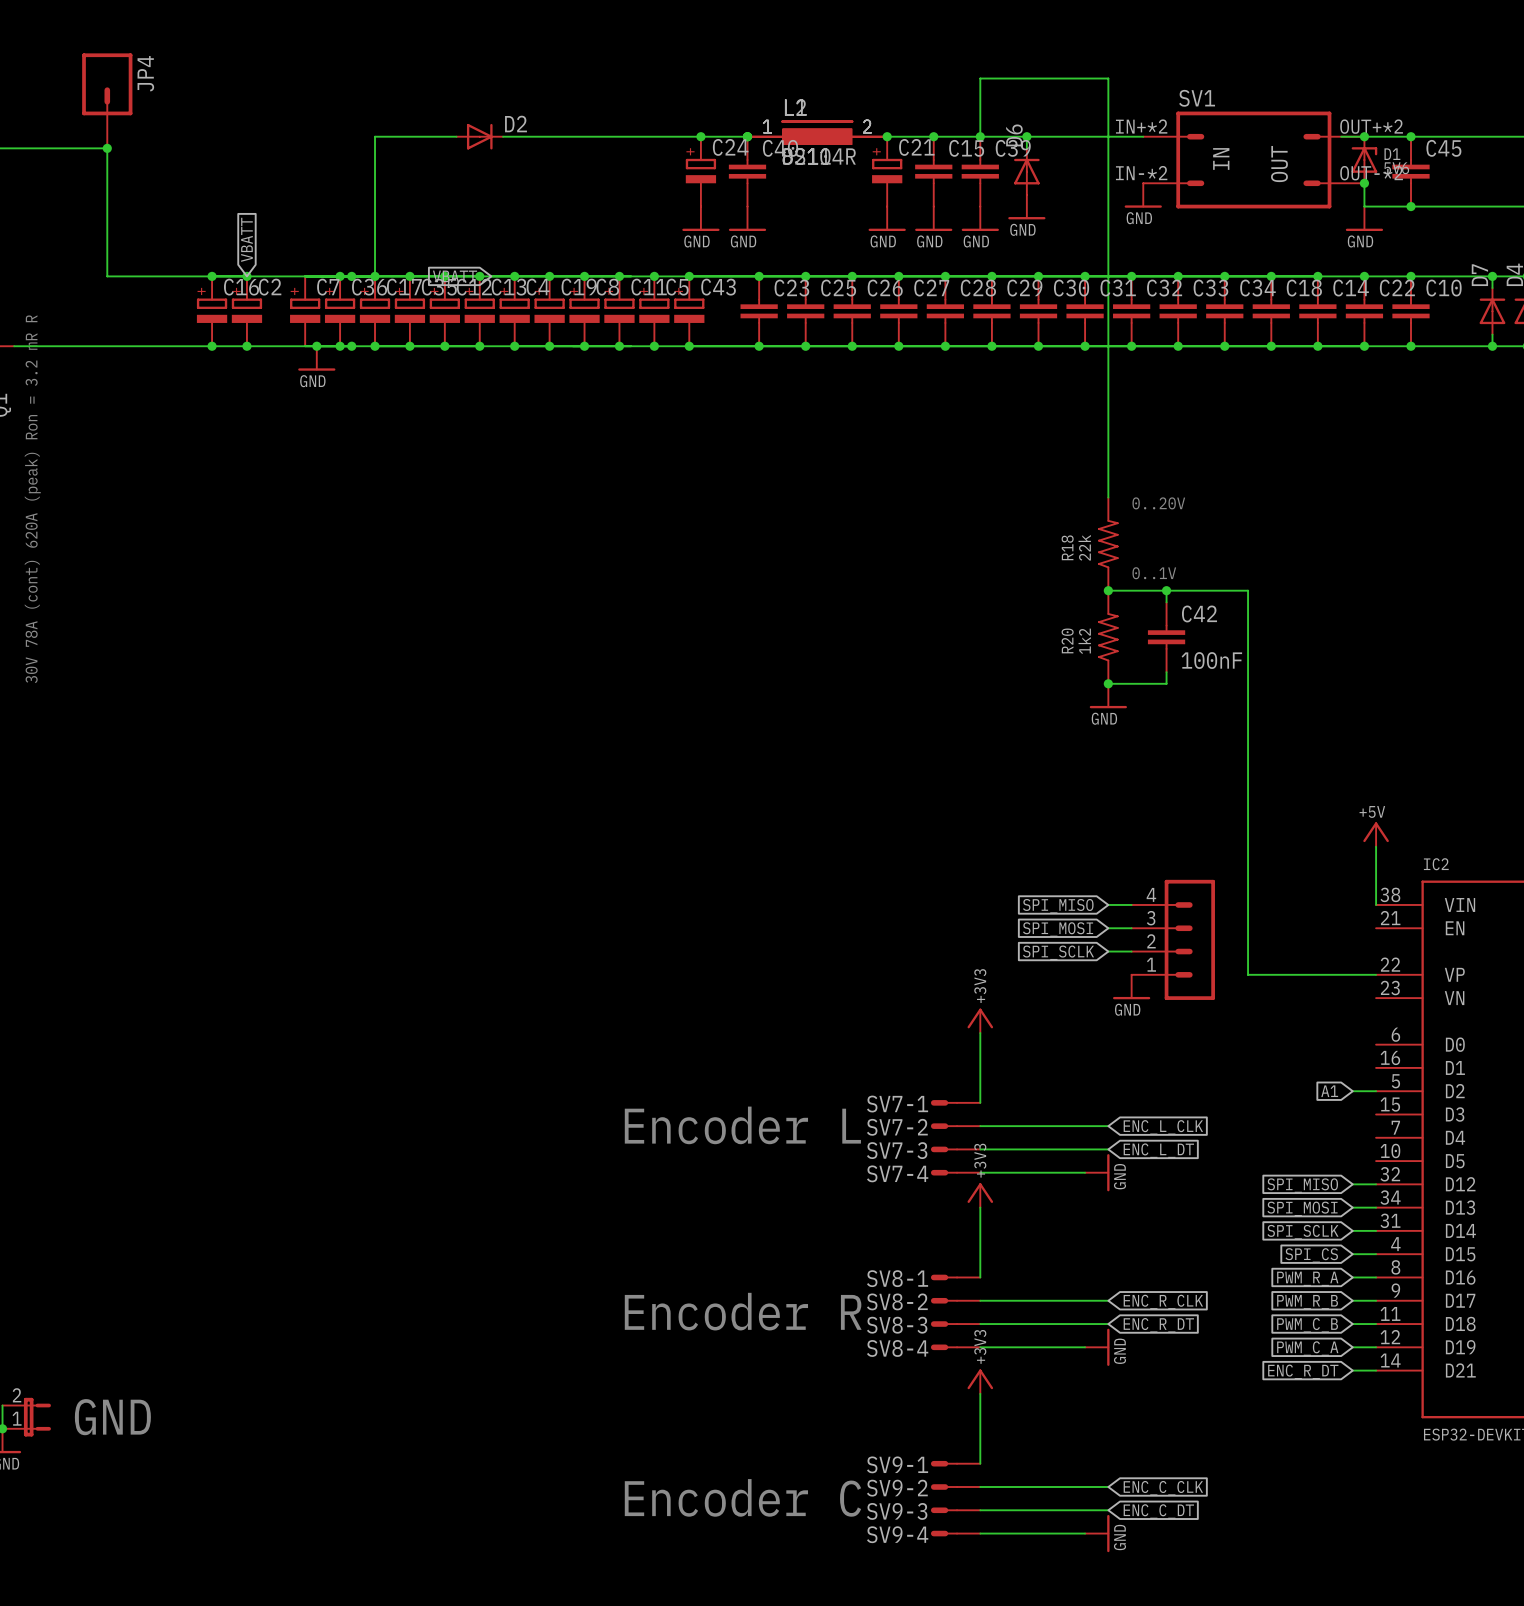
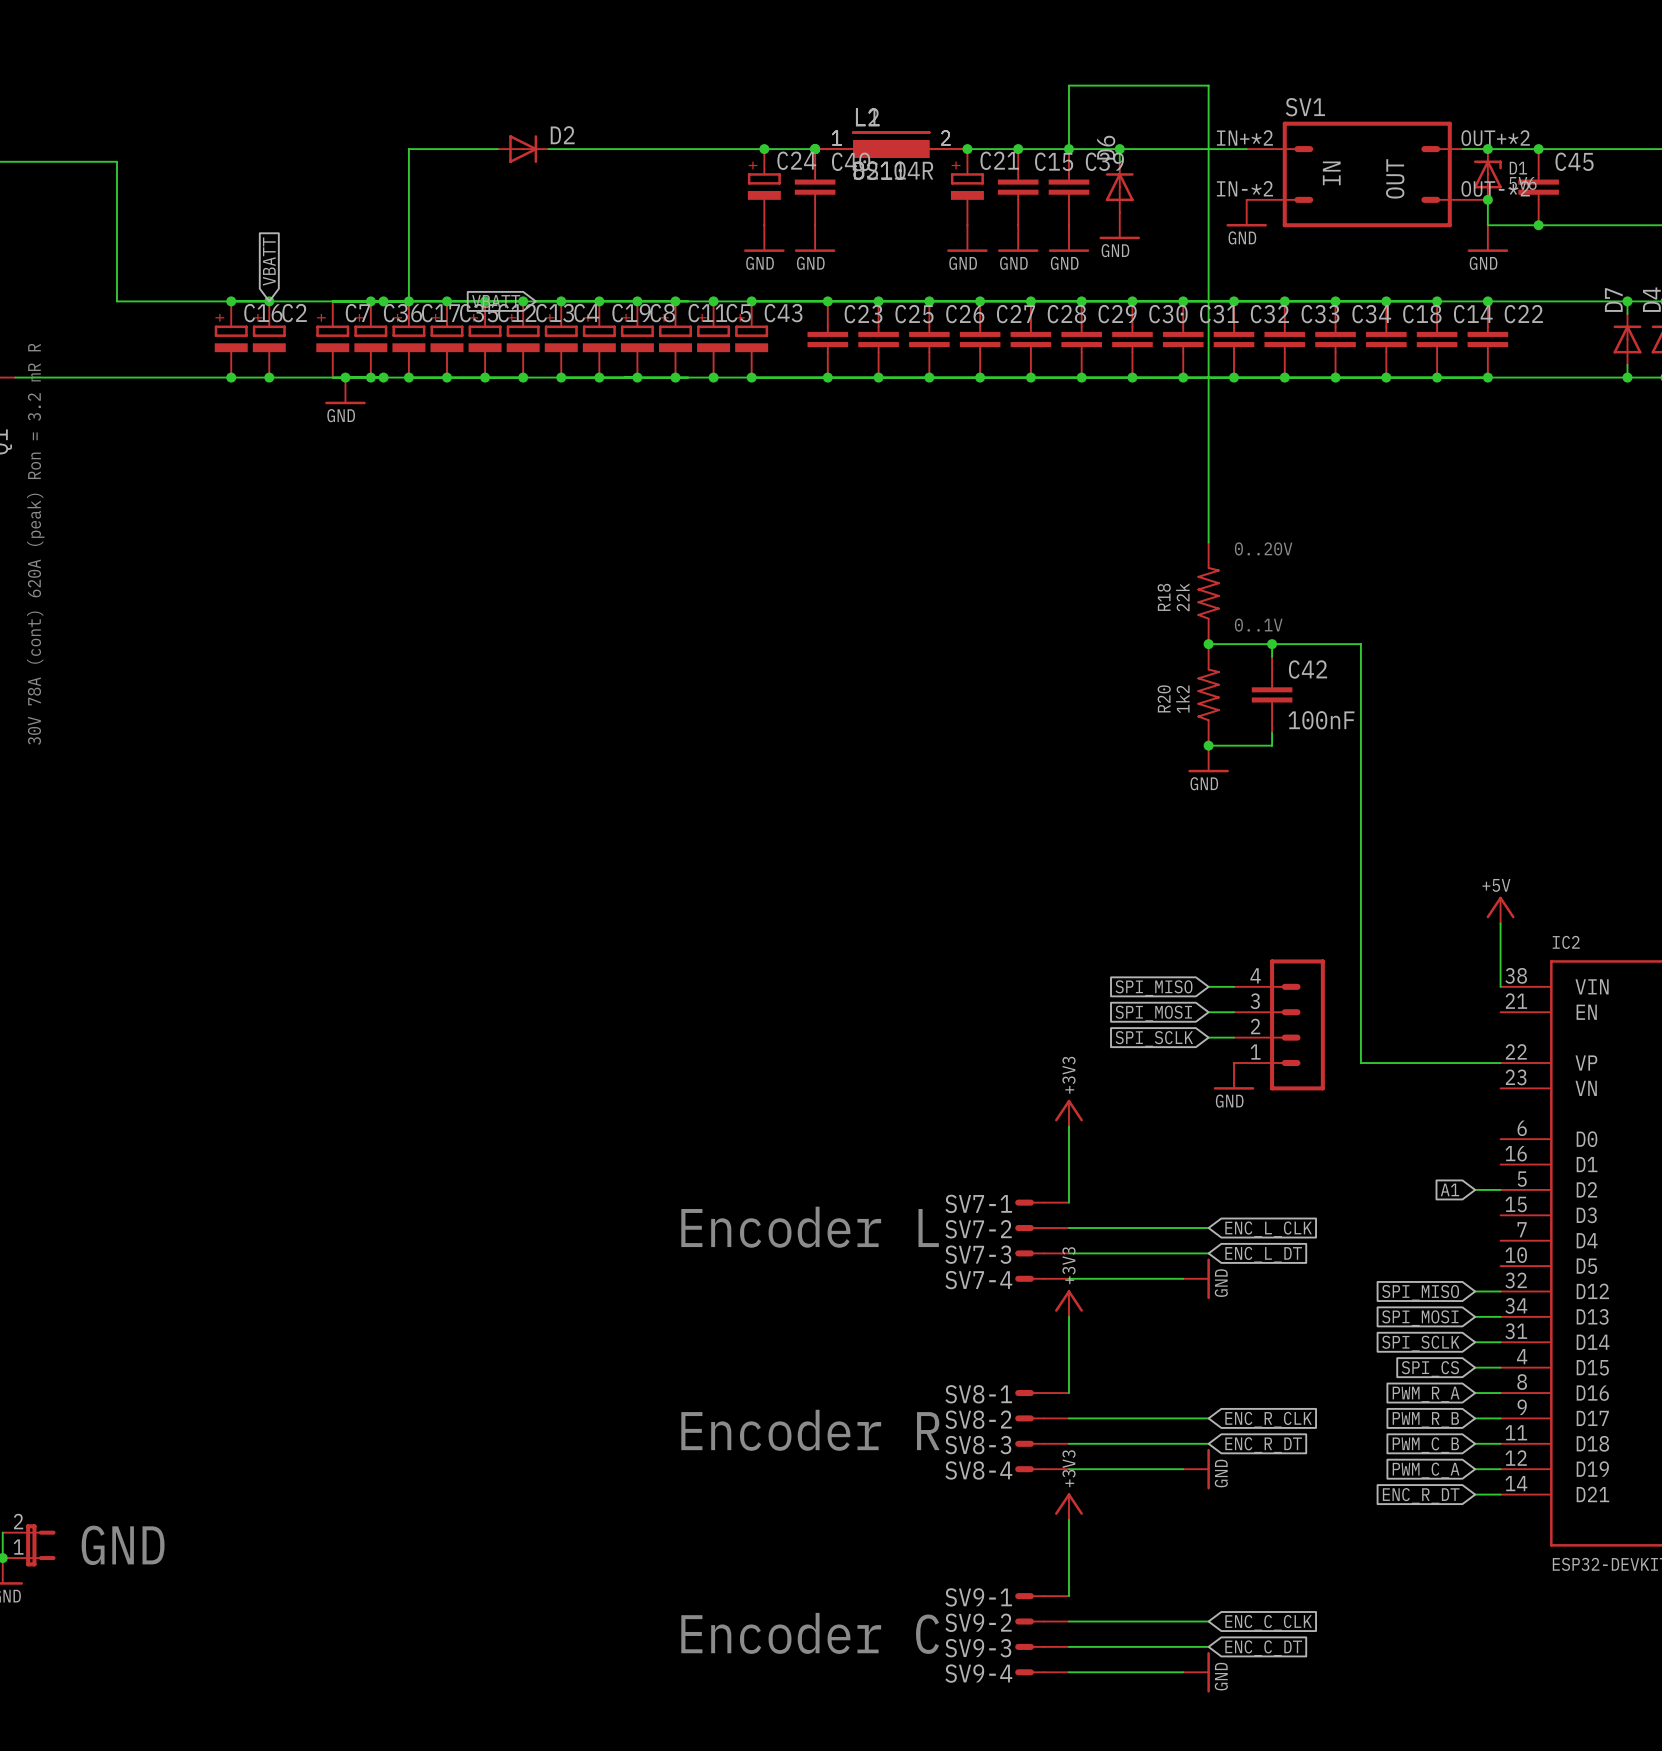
JP4: (107, 100) -> none
junction: (107, 148) -> none
junction: (1411, 276) -> none
C10: (1411, 311) -> none
junction: (1411, 346) -> none

